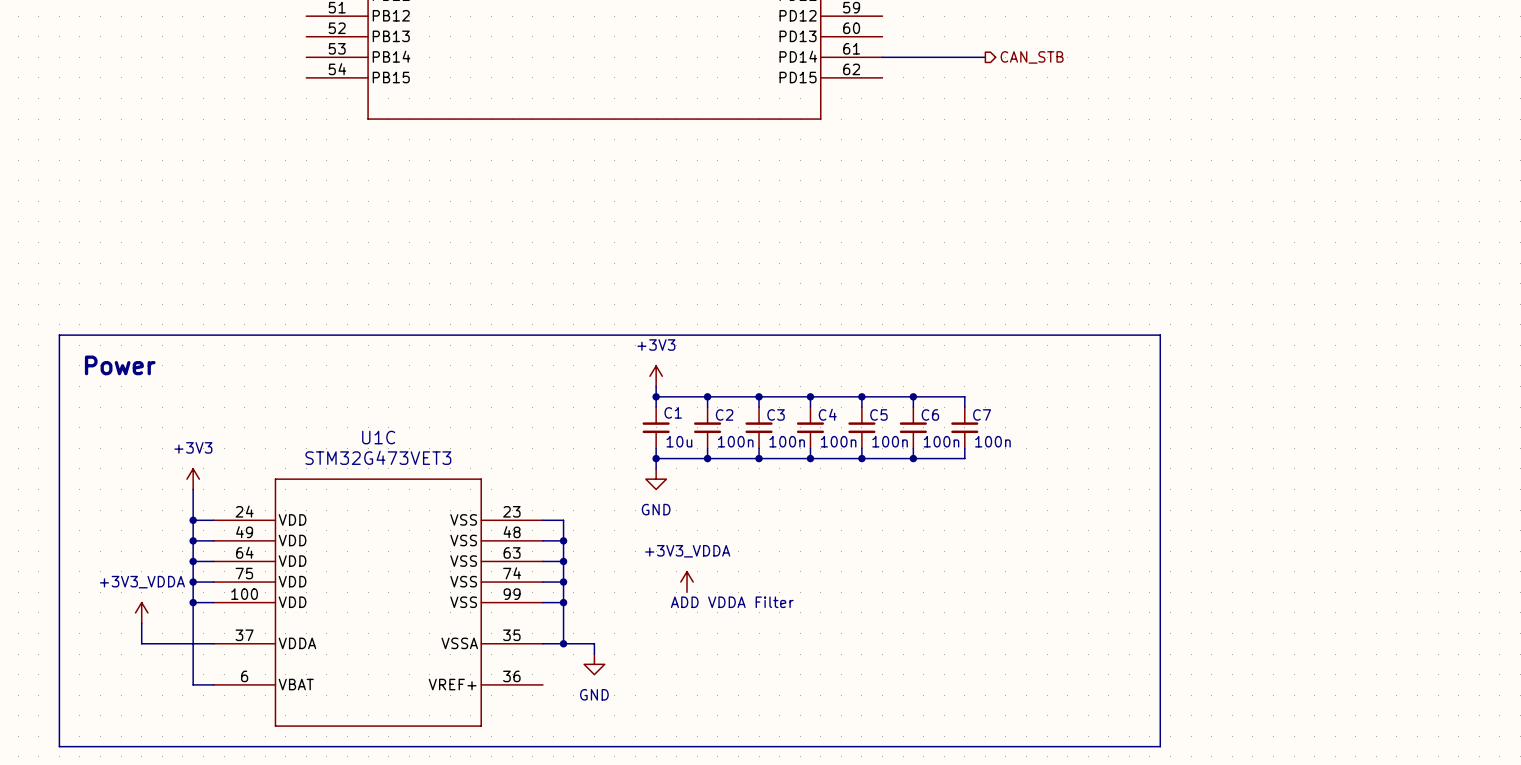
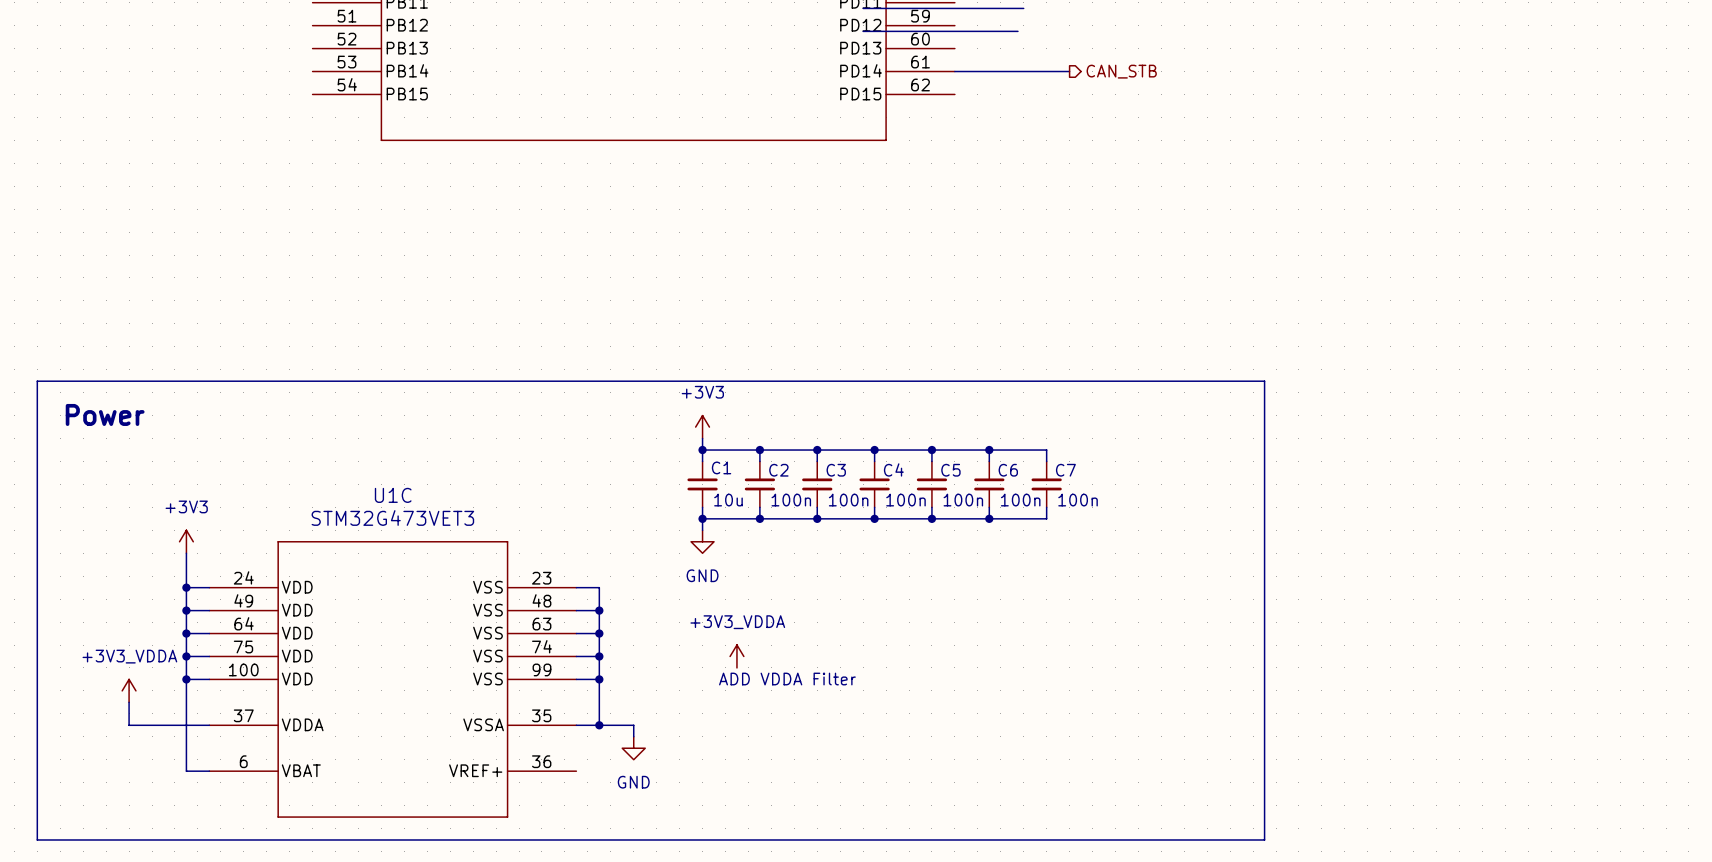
wire: none -> (863, 8) (1023, 8)
wire: none -> (863, 31) (1017, 31)

